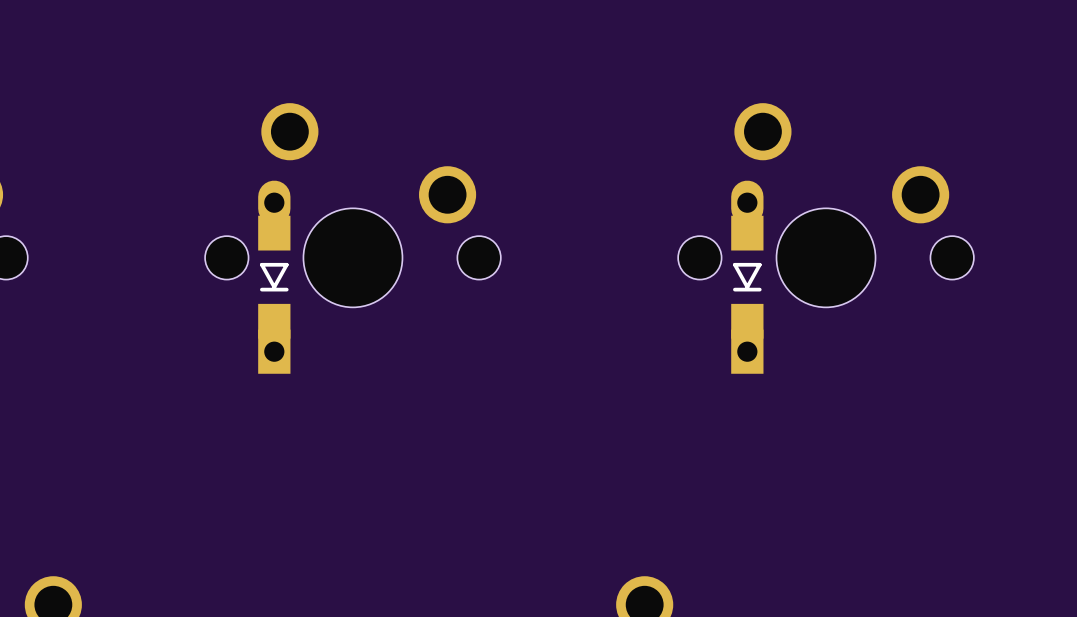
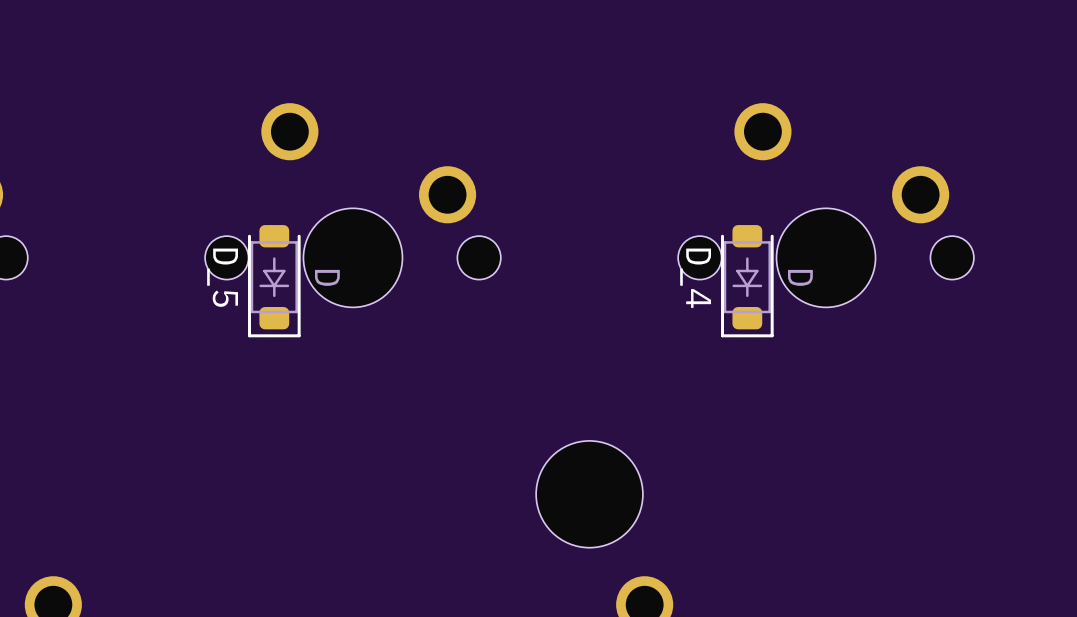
part: (274, 277) -> none
part: (747, 277) -> none
D_5: none -> D (274, 281)
D_4: none -> D (747, 281)
part: none -> (589, 494)

